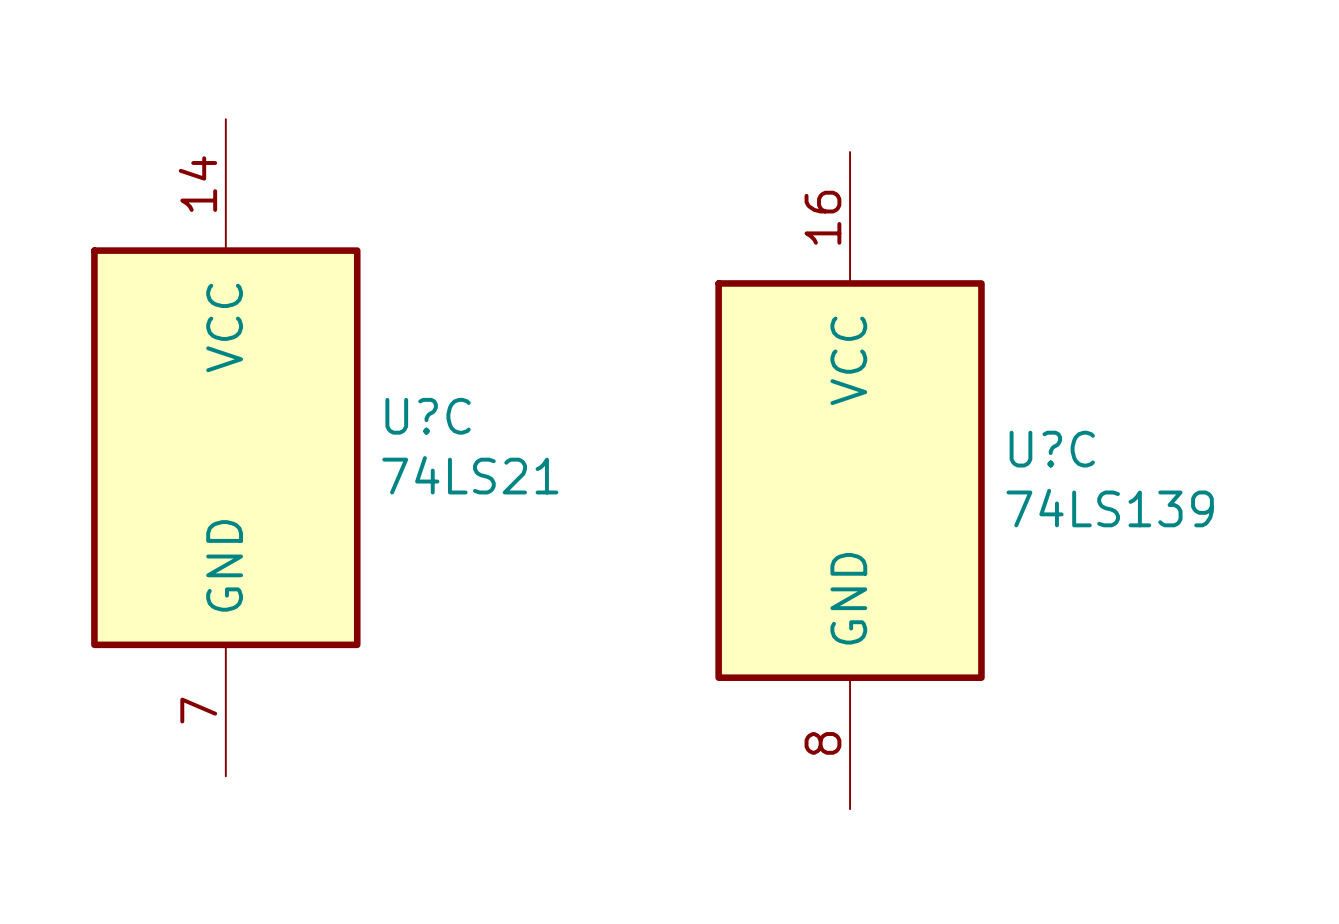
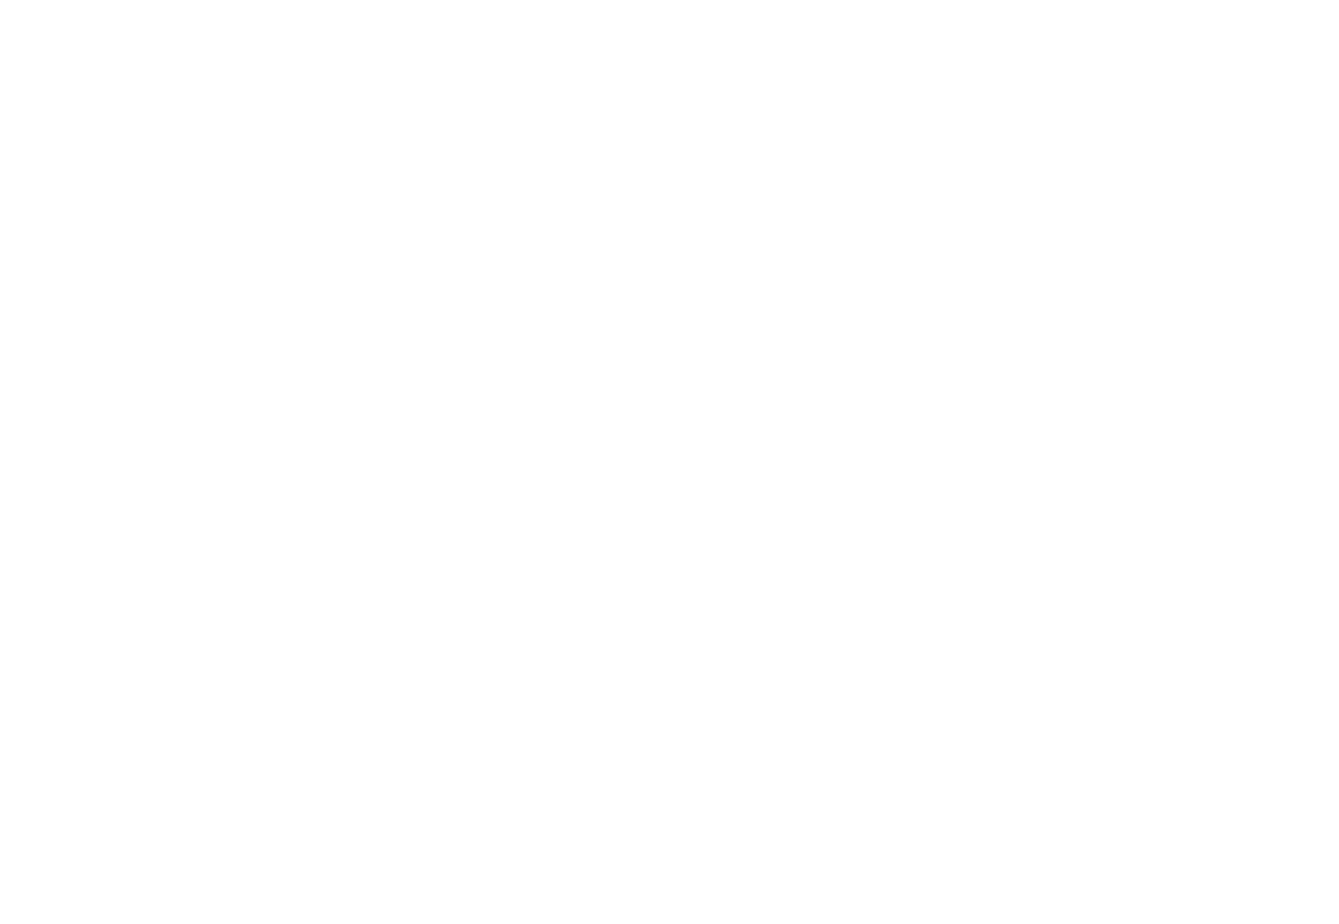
U?C: 74LS21 (225, 447) -> none
U?C: 74LS139 (850, 480) -> none

